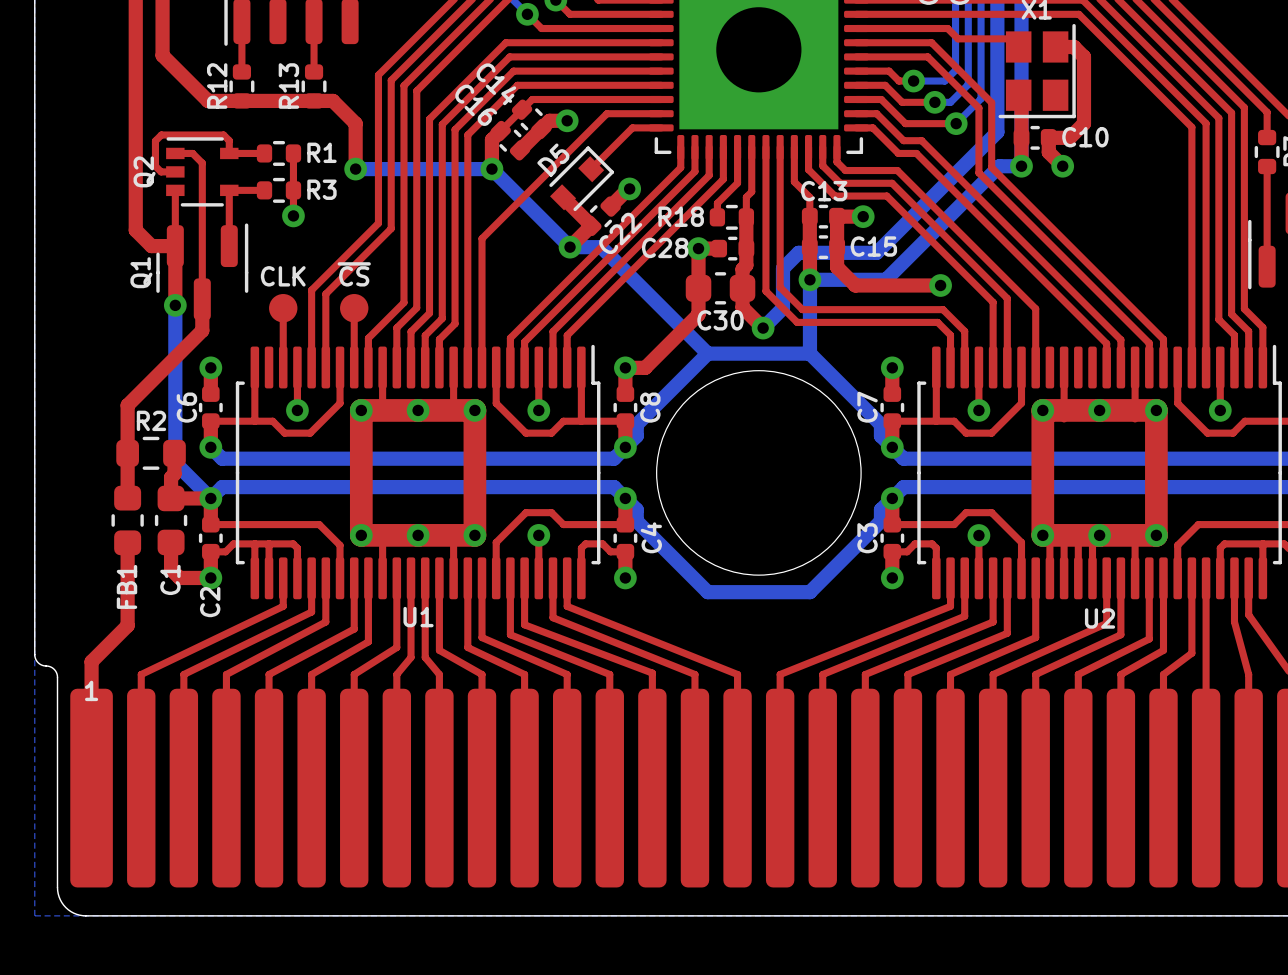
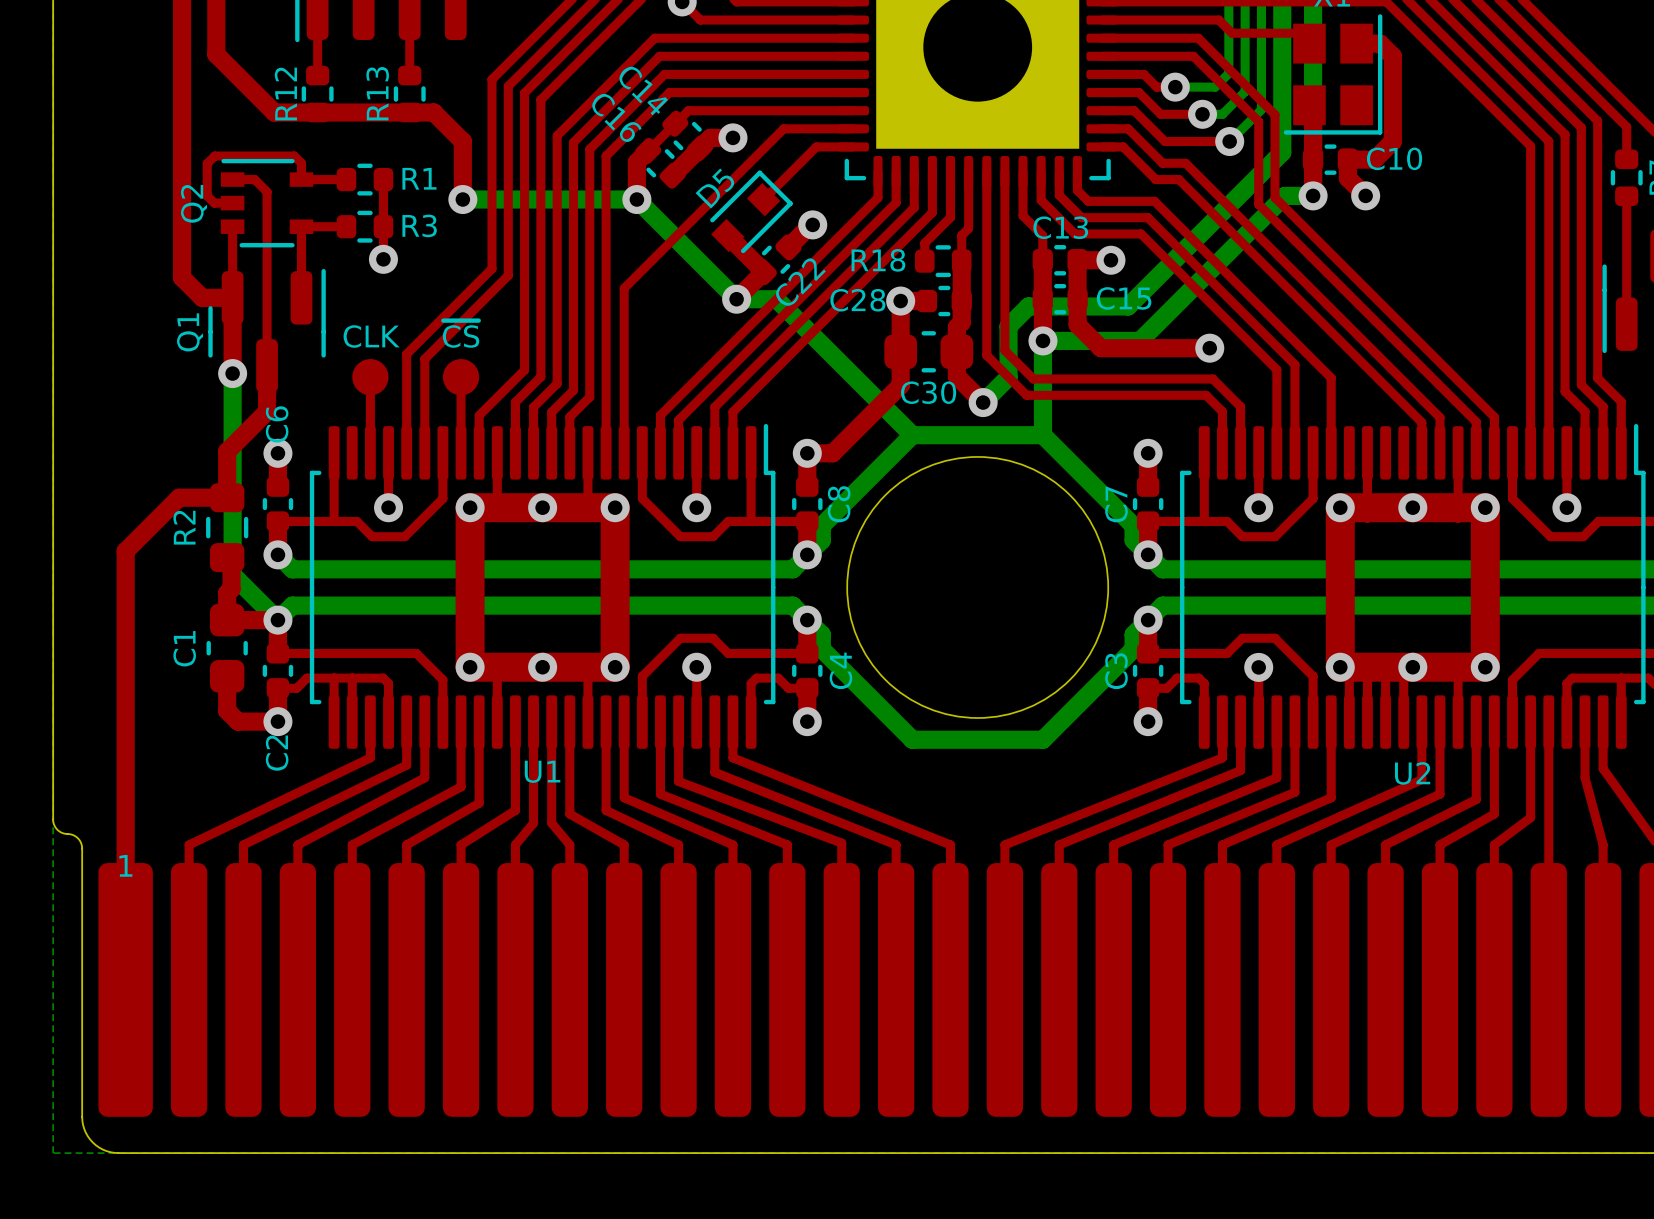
top track: (202, 330) (127, 405) (127, 498) -> (267, 405) (267, 411) (227, 451) (227, 497) (179, 497) (125, 551) (125, 828)
C6 name position: C6 (186, 407) -> C6 (277, 424)
R2 rotation: 0° (151, 453) -> 90° clockwise (227, 527)
FB1: (127, 520) -> none
top track: (127, 542) (127, 625) (91, 661) -> none
C1 name position: C1 (170, 579) -> C1 (184, 648)

